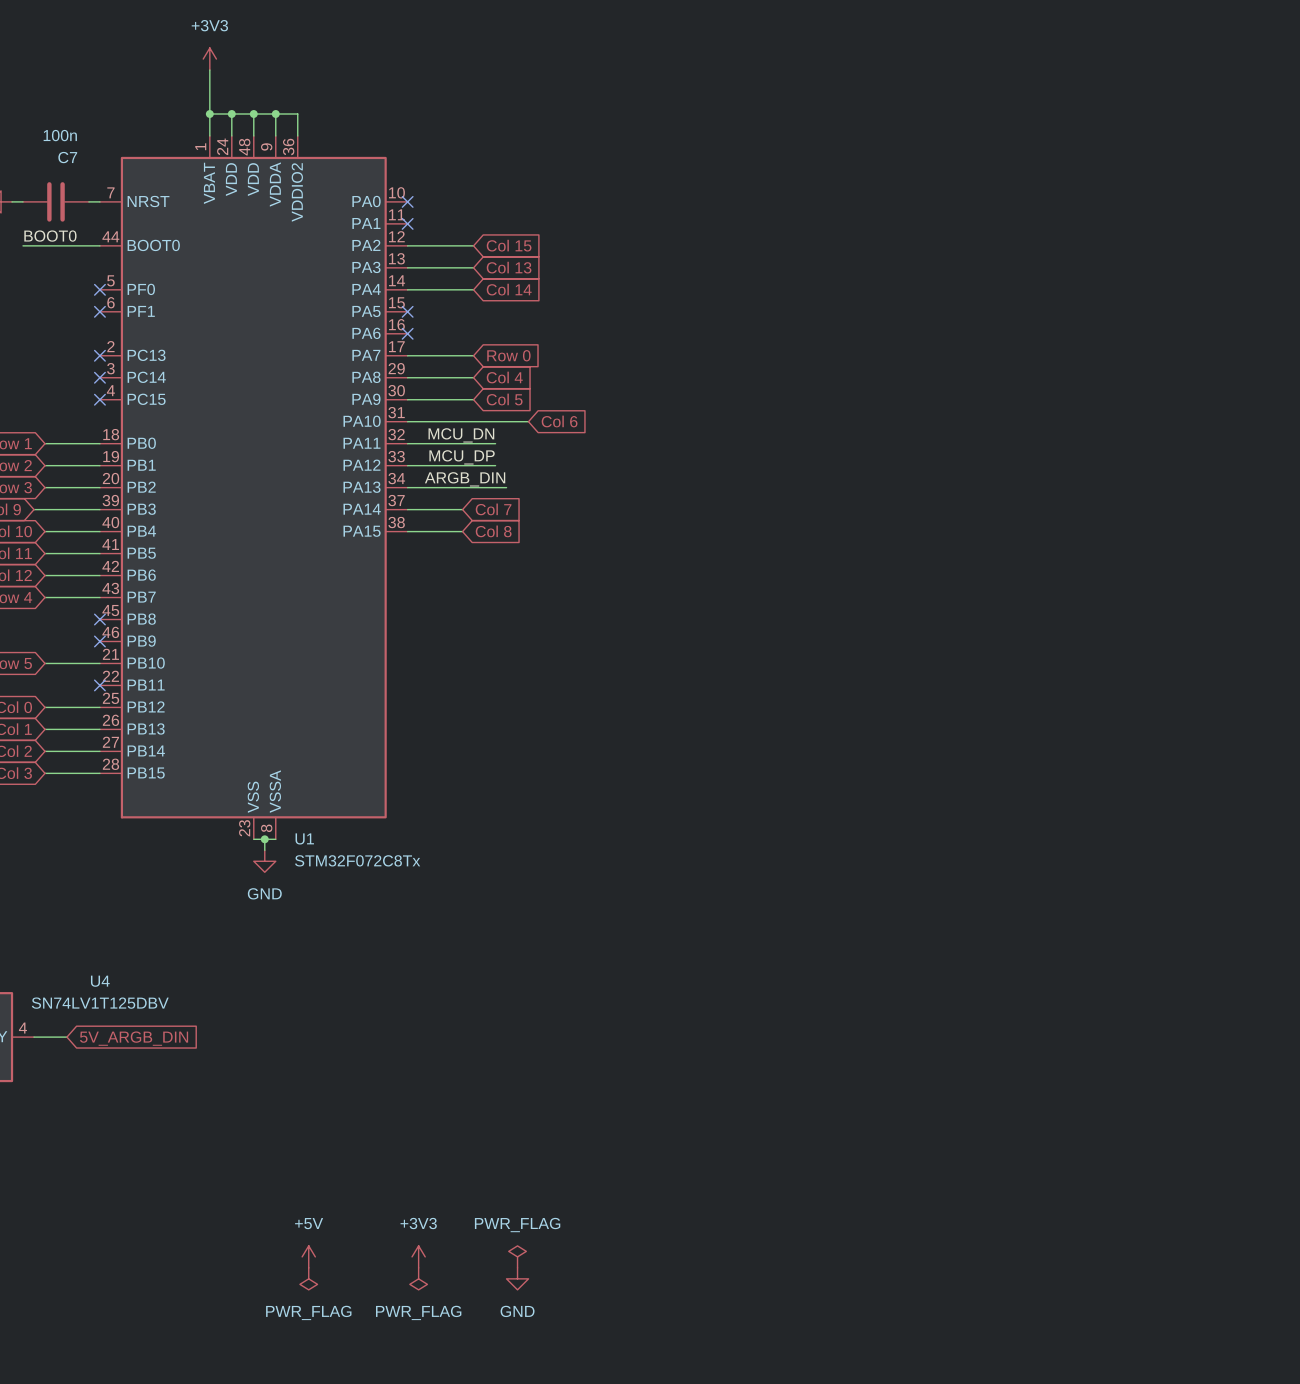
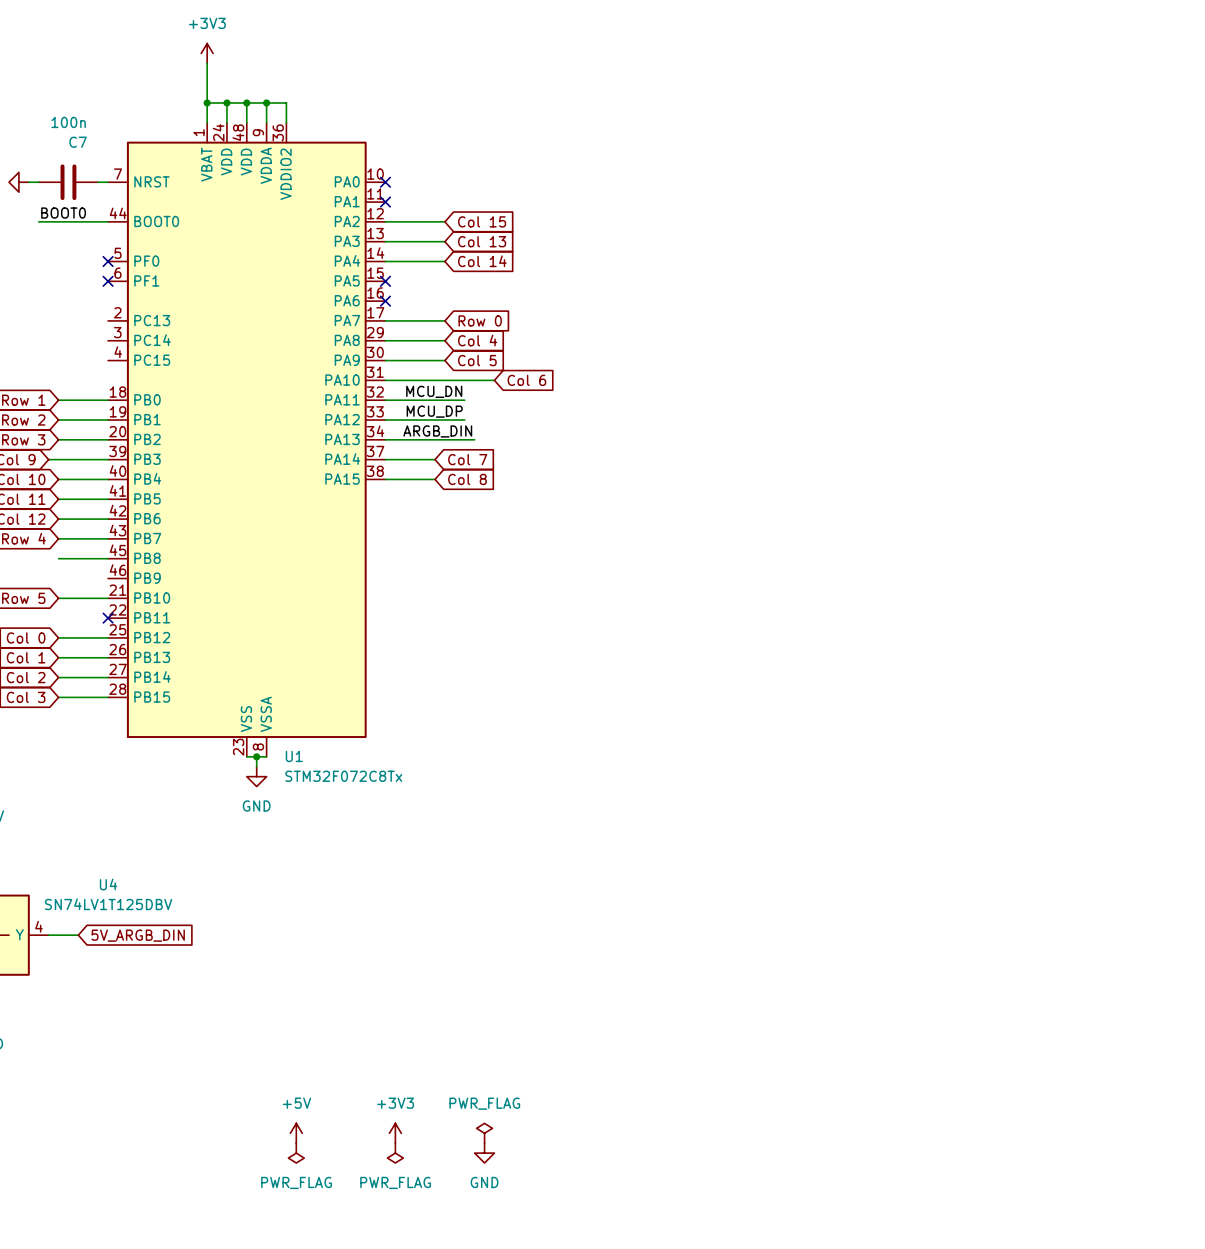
no-connect mark: (99, 355) -> none
no-connect mark: (99, 377) -> none
no-connect mark: (99, 399) -> none
wire: none -> (58, 558) (108, 558)
no-connect mark: (99, 619) -> none
no-connect mark: (99, 641) -> none

